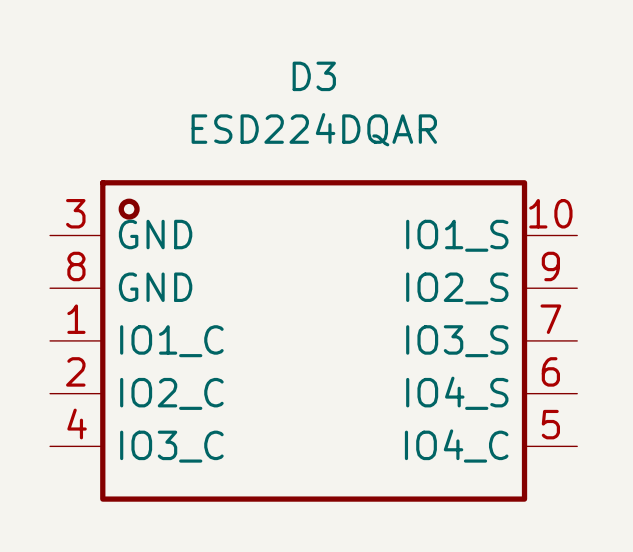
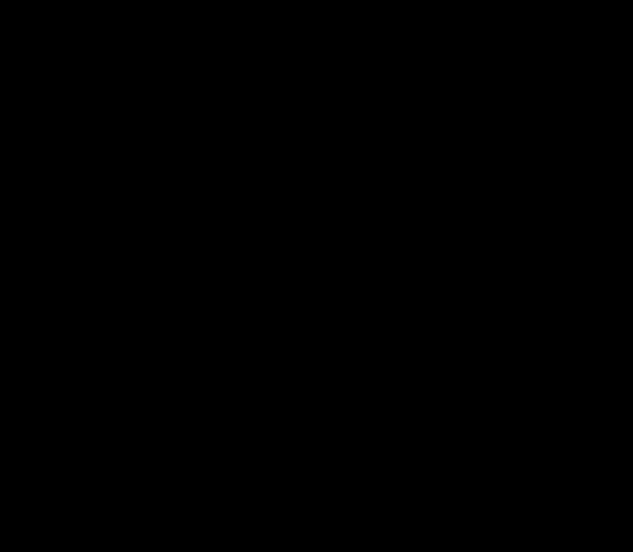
D3: ESD224DQAR (313, 340) -> none

